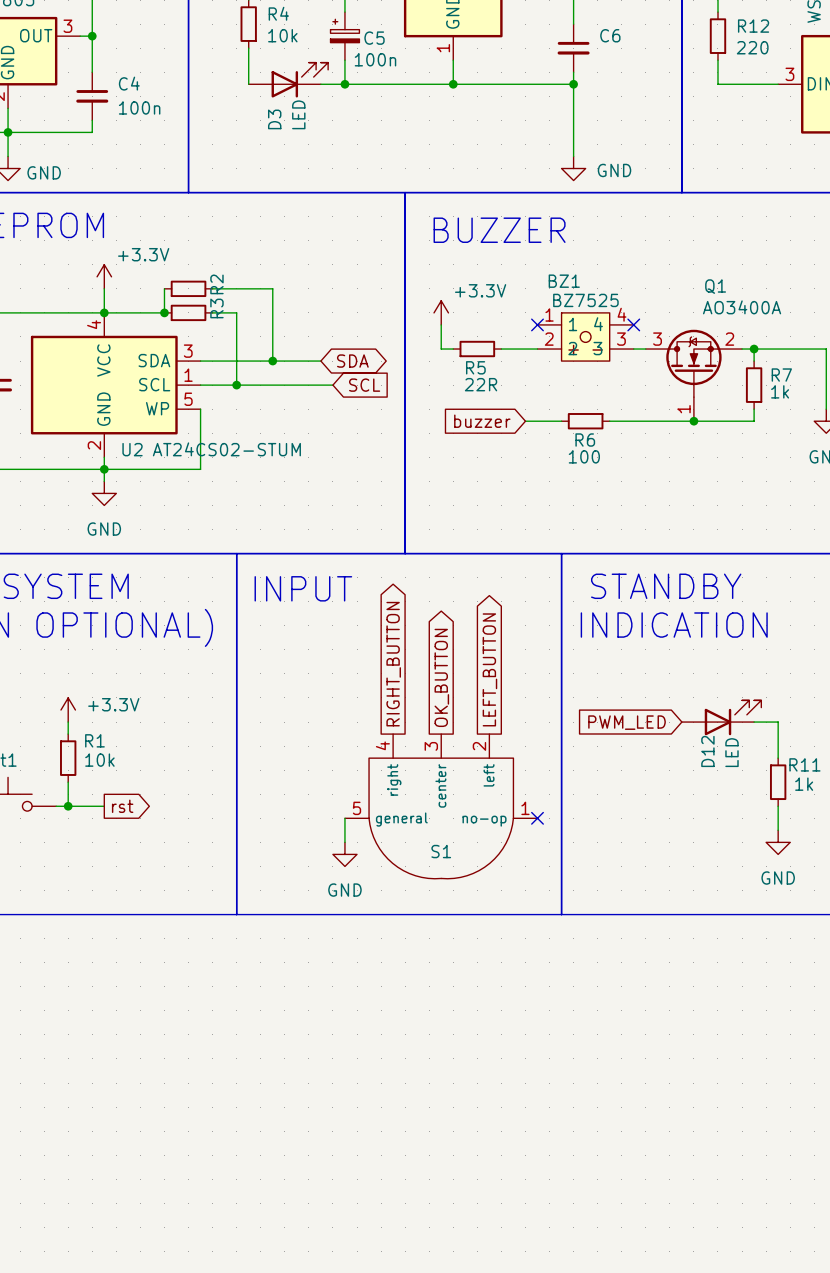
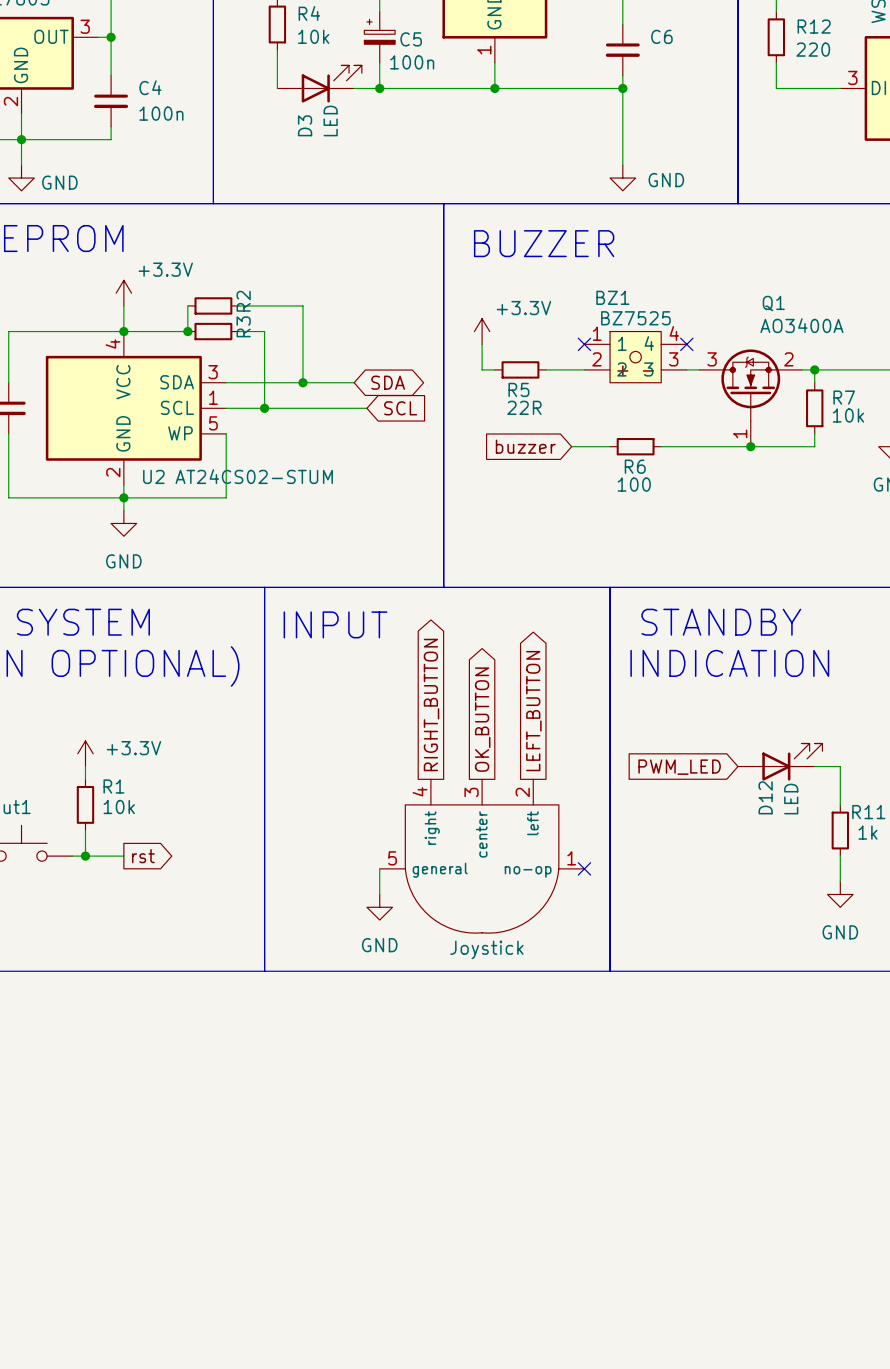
R7 value: 1k (780, 391) -> 10k (848, 415)
S1 name: S1 (441, 851) -> Joystick (486, 949)

